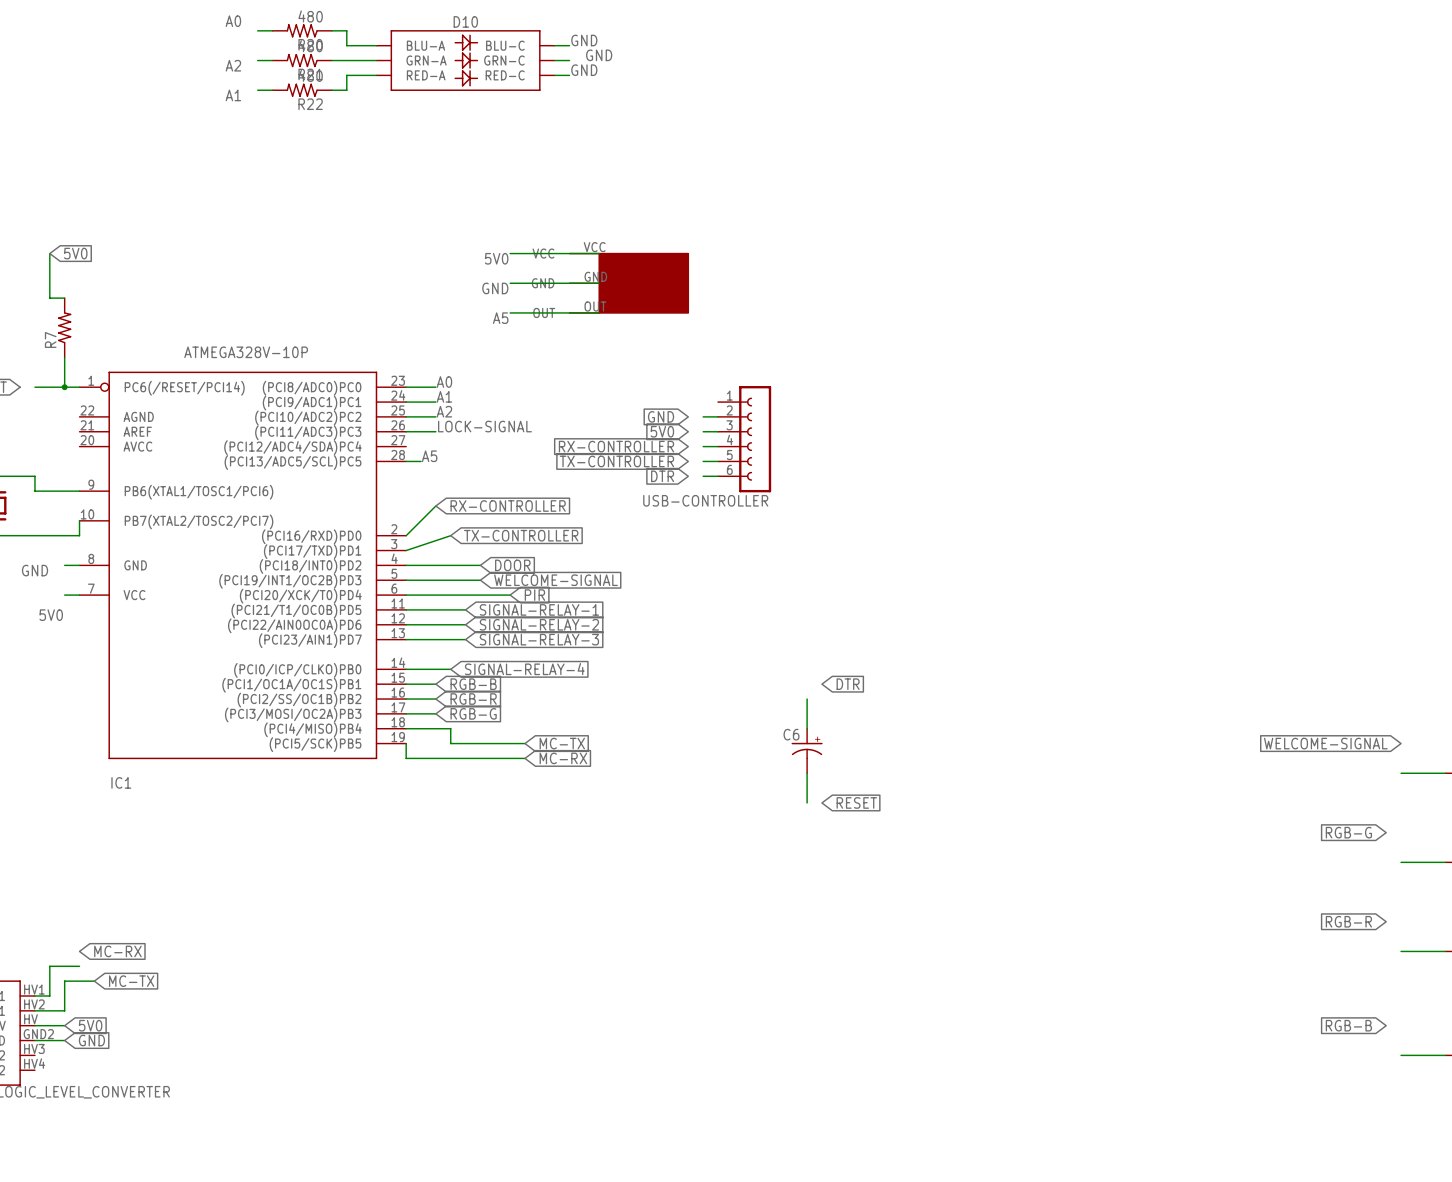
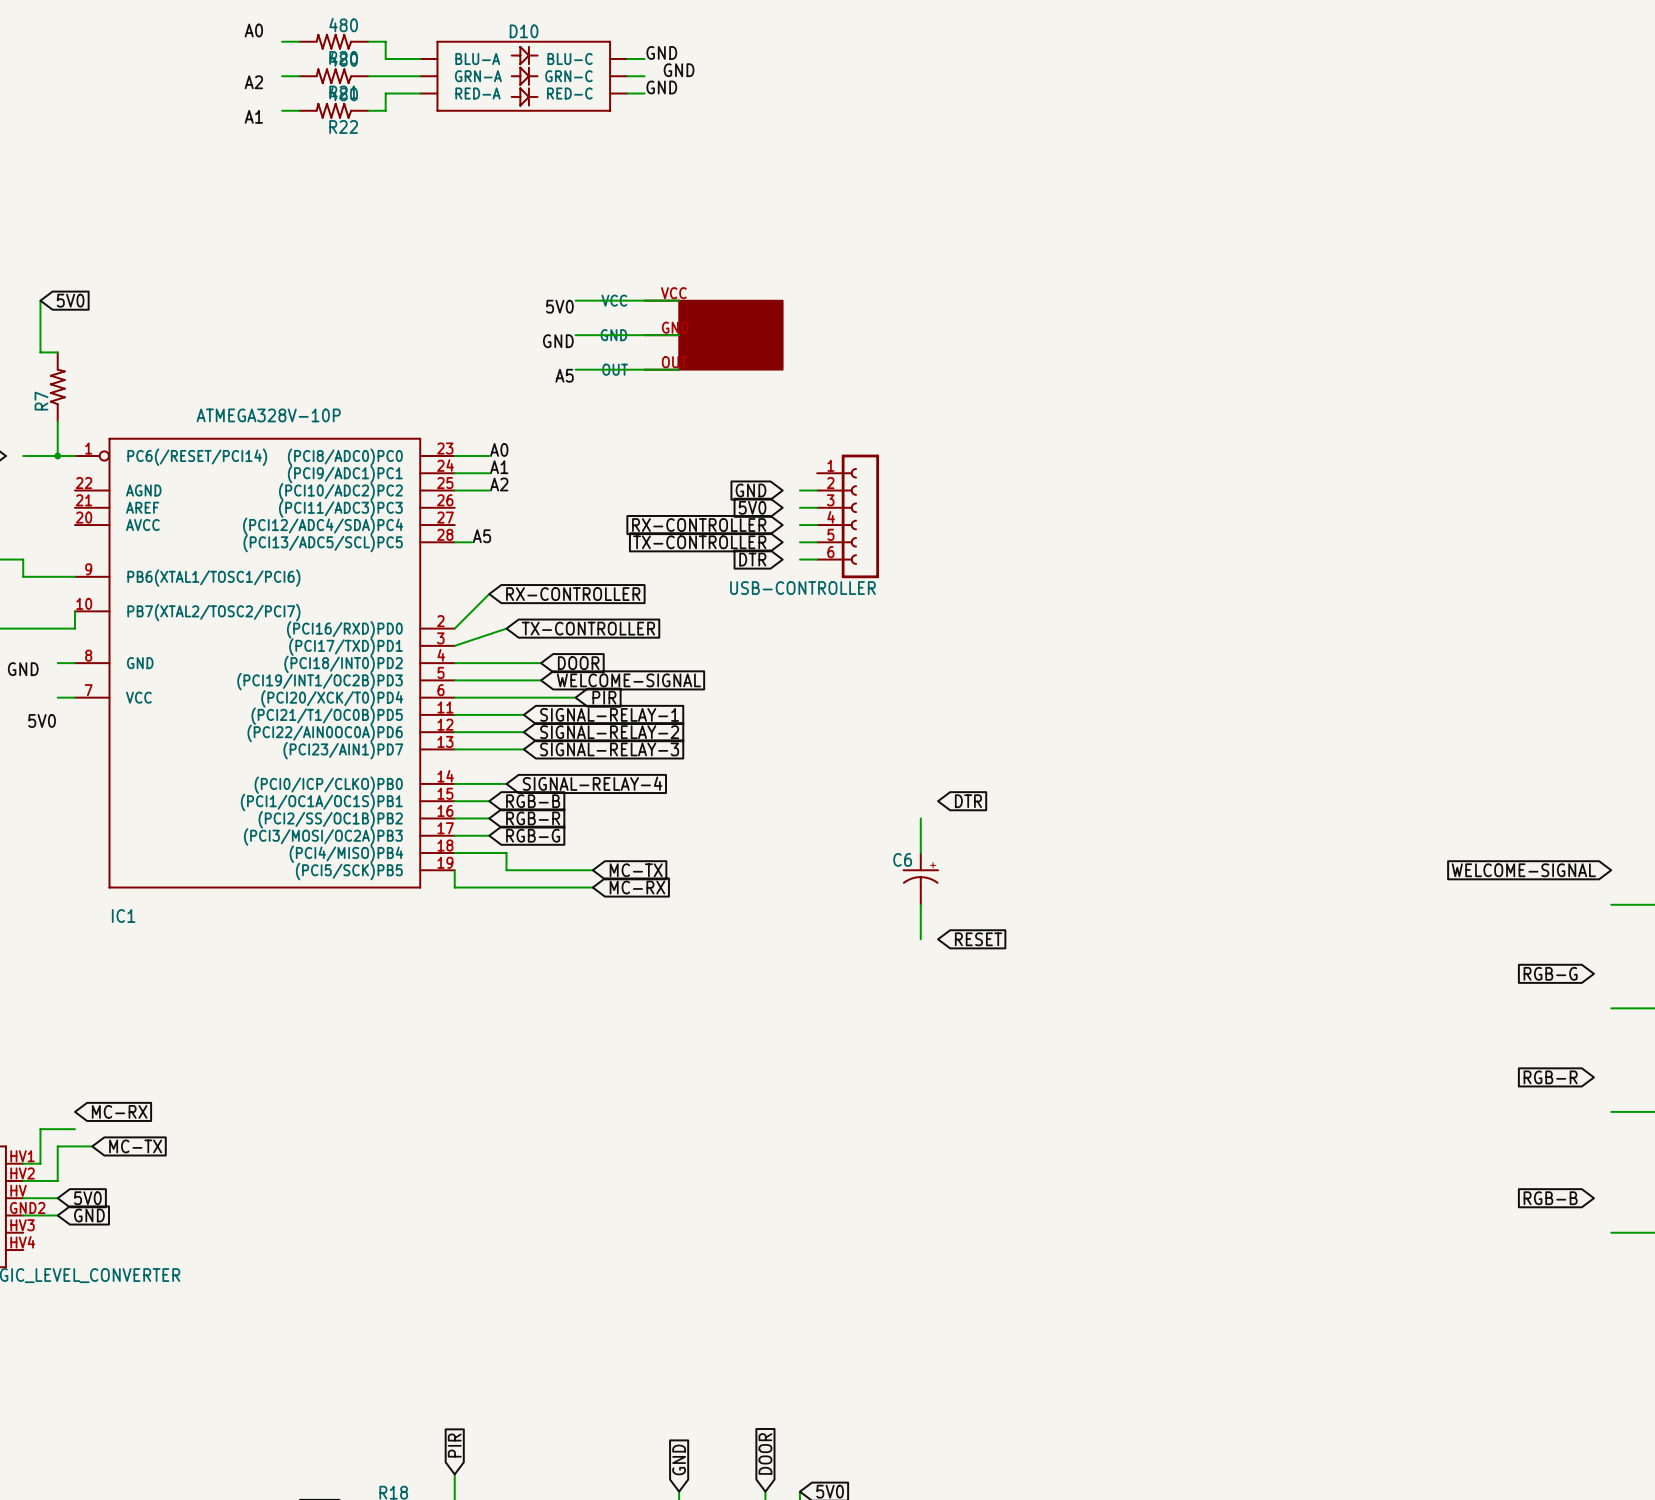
label: LOCK-SIGNAL (484, 426) -> none
wire: (406, 431) (435, 431) -> none

